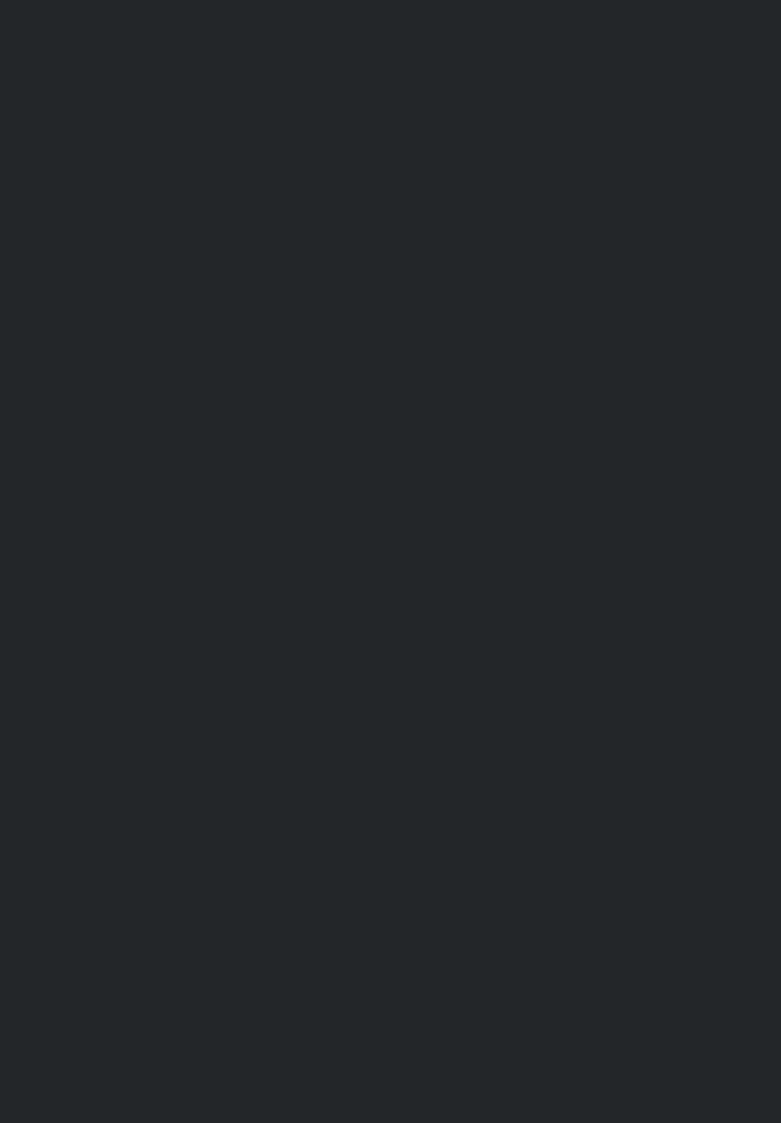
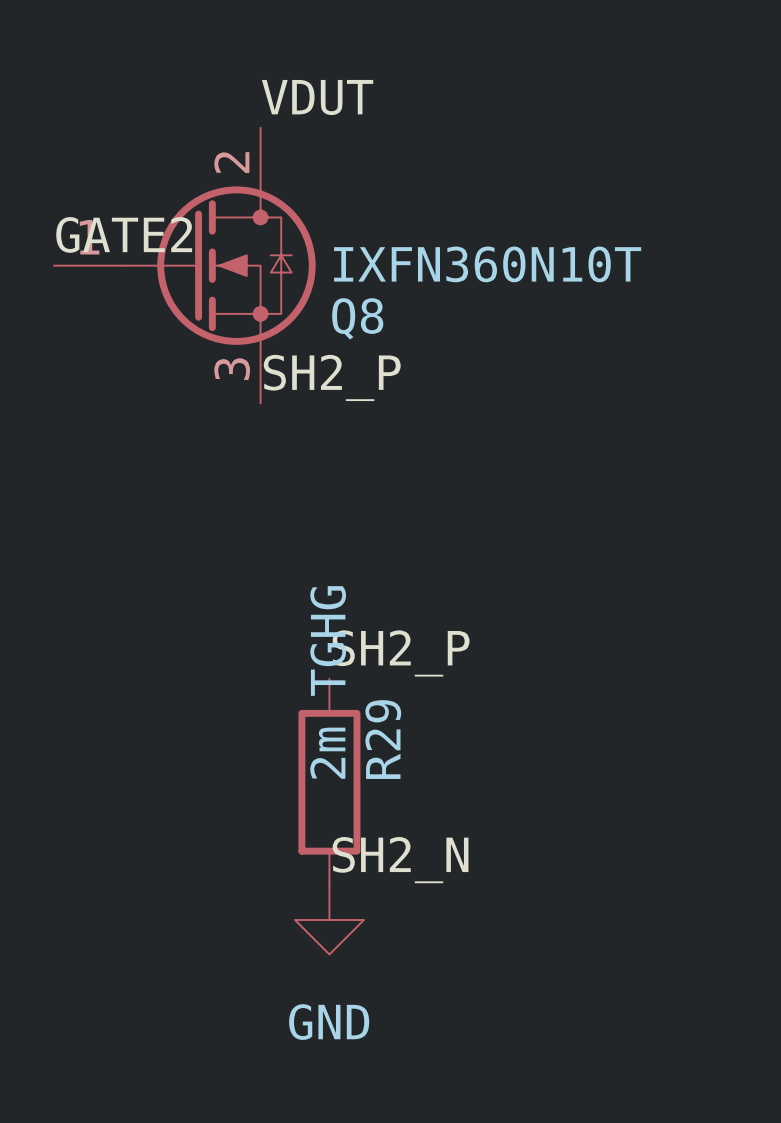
label: none -> VDUT (317, 97)
label: none -> GATE2 (124, 234)
Q8: none -> IXFN360N10T (184, 265)
label: none -> SH2_P (332, 377)
label: none -> SH2_P (401, 653)
R29: none -> 2m TGHG (329, 782)
label: none -> SH2_N (400, 860)
power symbol: none -> GND (329, 920)

